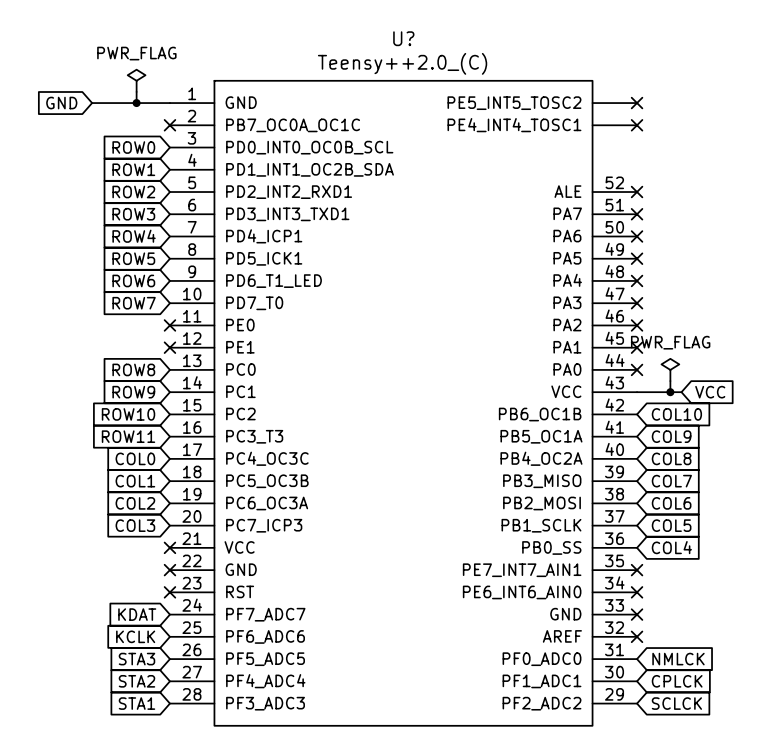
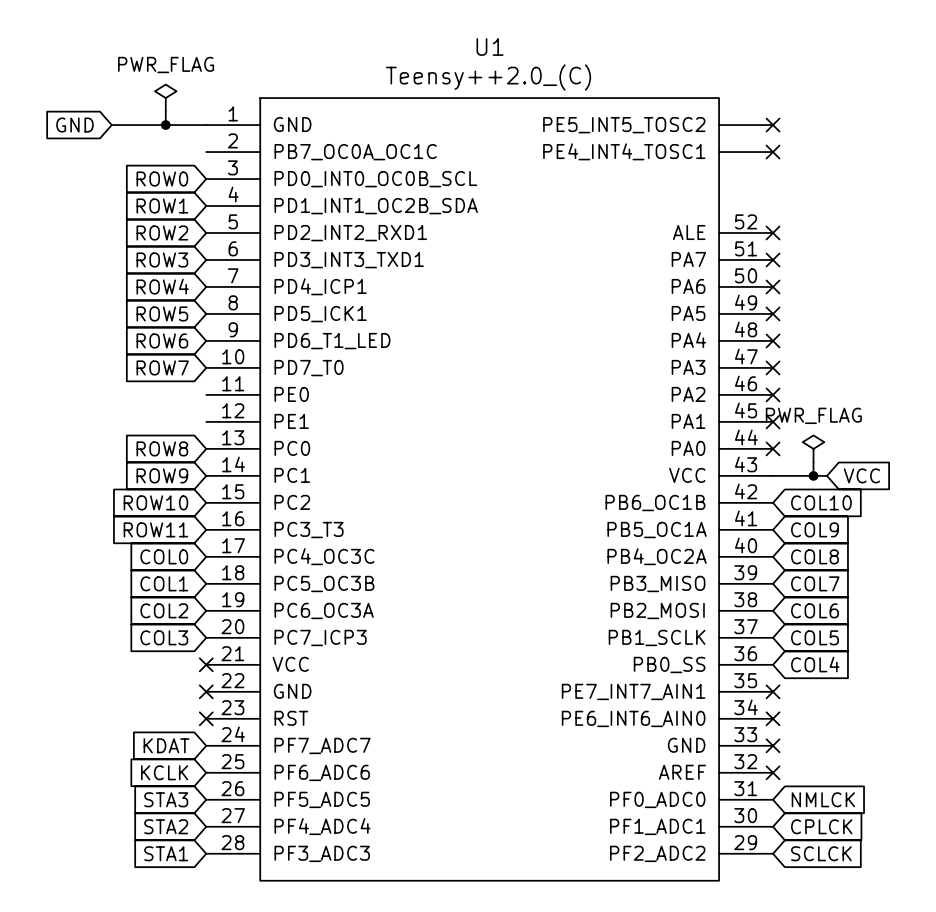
U? name: U? (403, 38) -> U1 (490, 46)
no-connect mark: (169, 125) -> none
no-connect mark: (169, 325) -> none
no-connect mark: (169, 347) -> none

